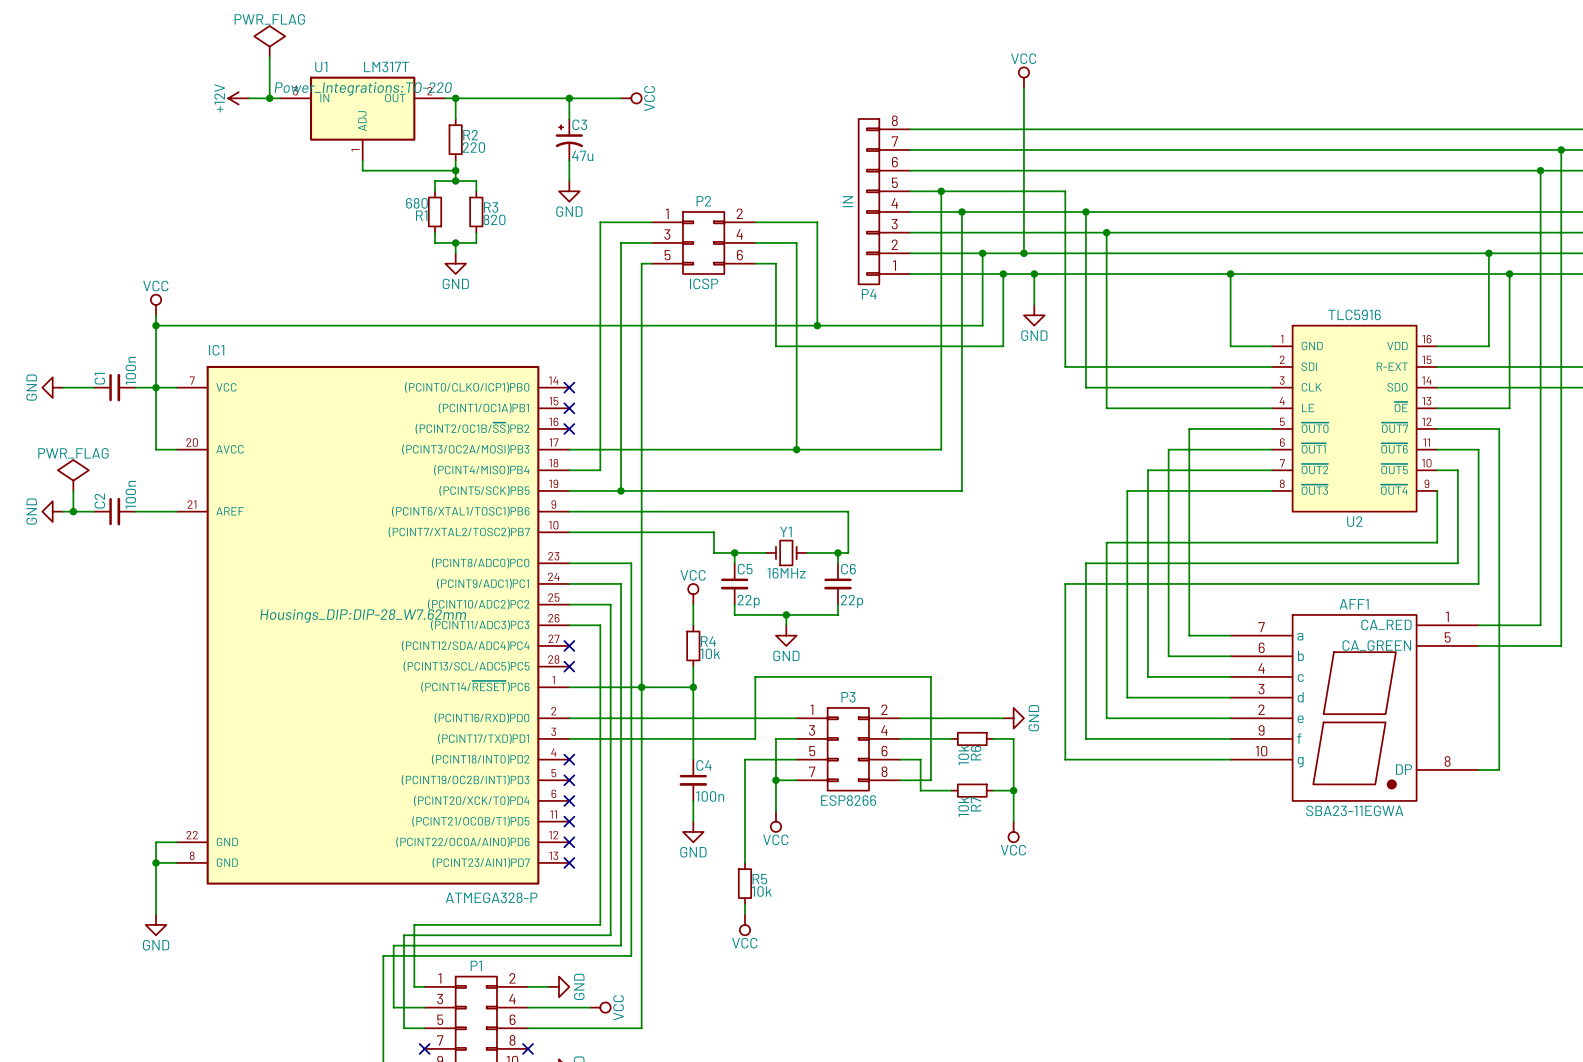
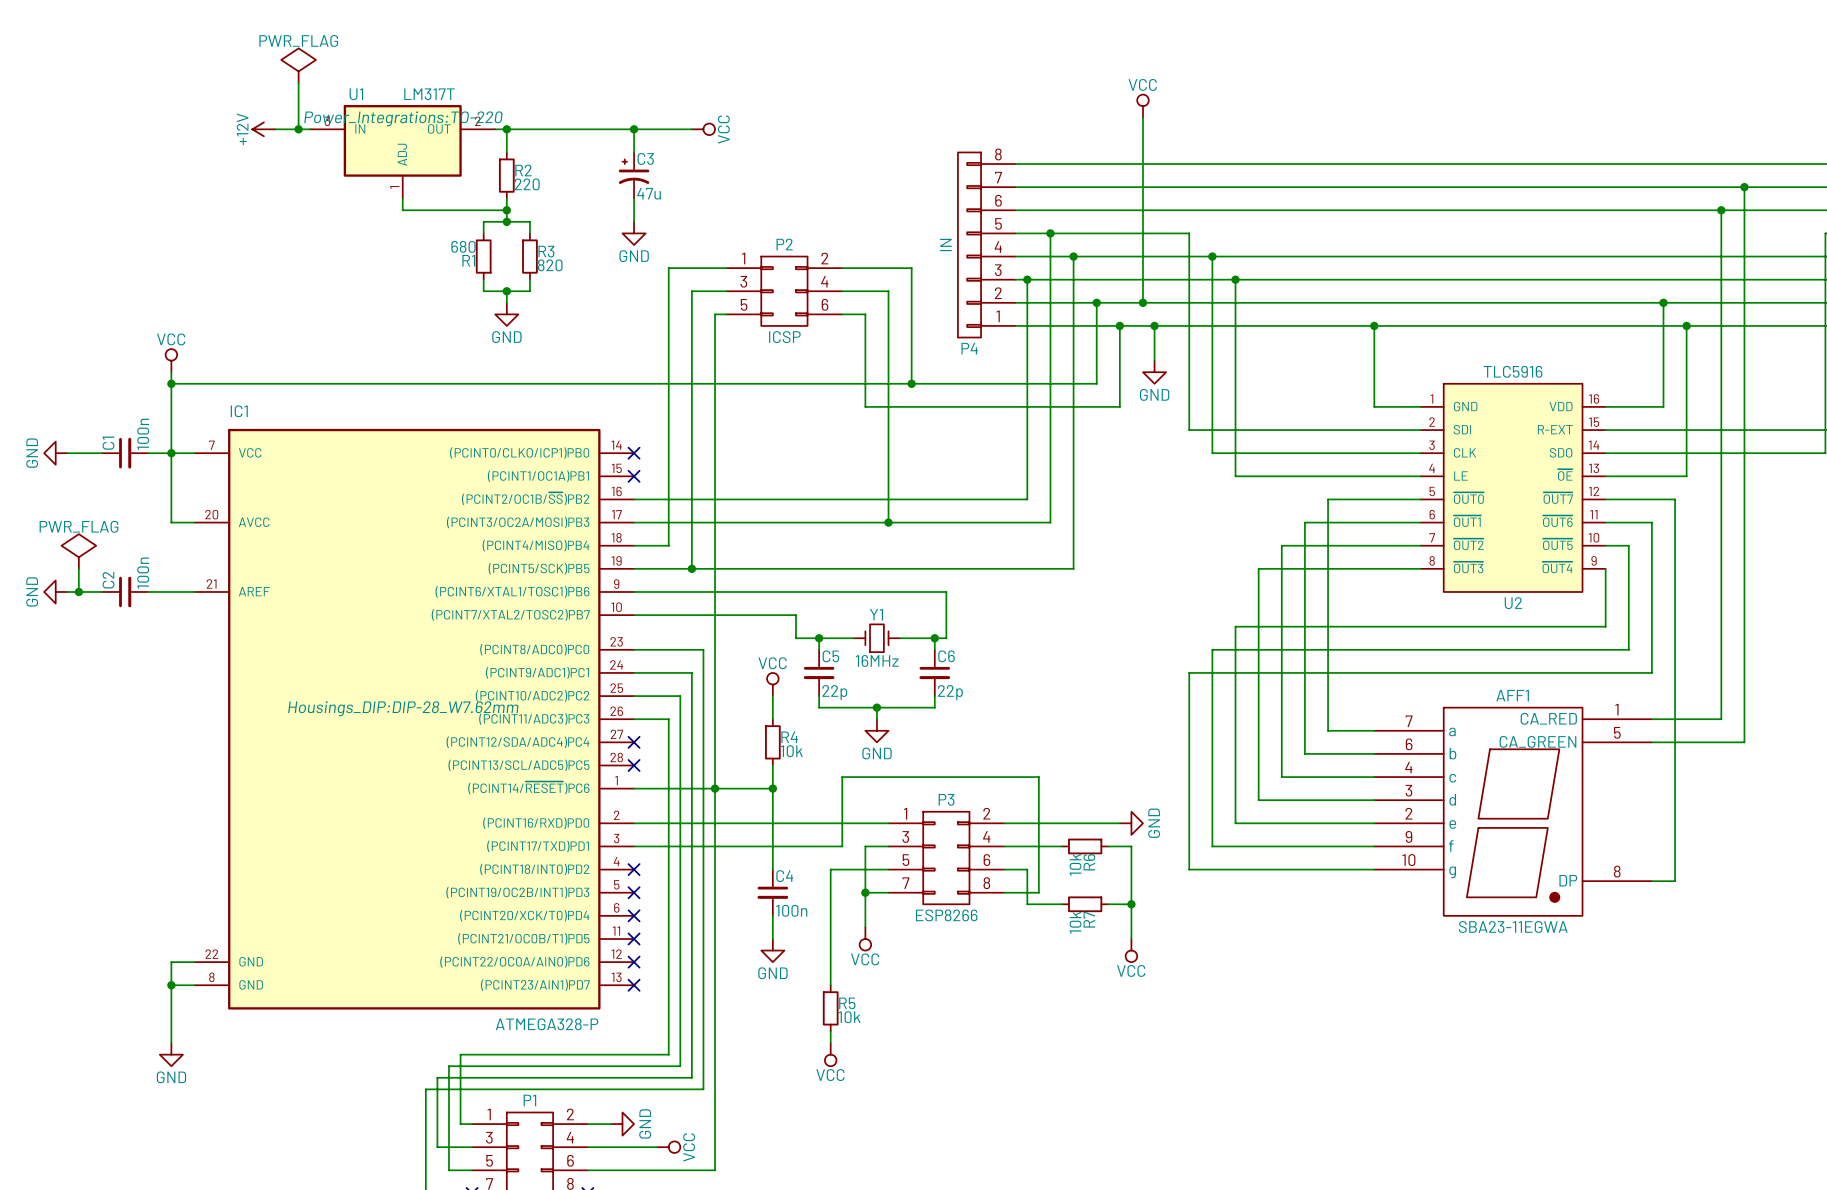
wire: none -> (1027, 279) (1027, 499) (634, 499)
junction: none -> (1027, 279)
no-connect mark: (569, 428) -> none

